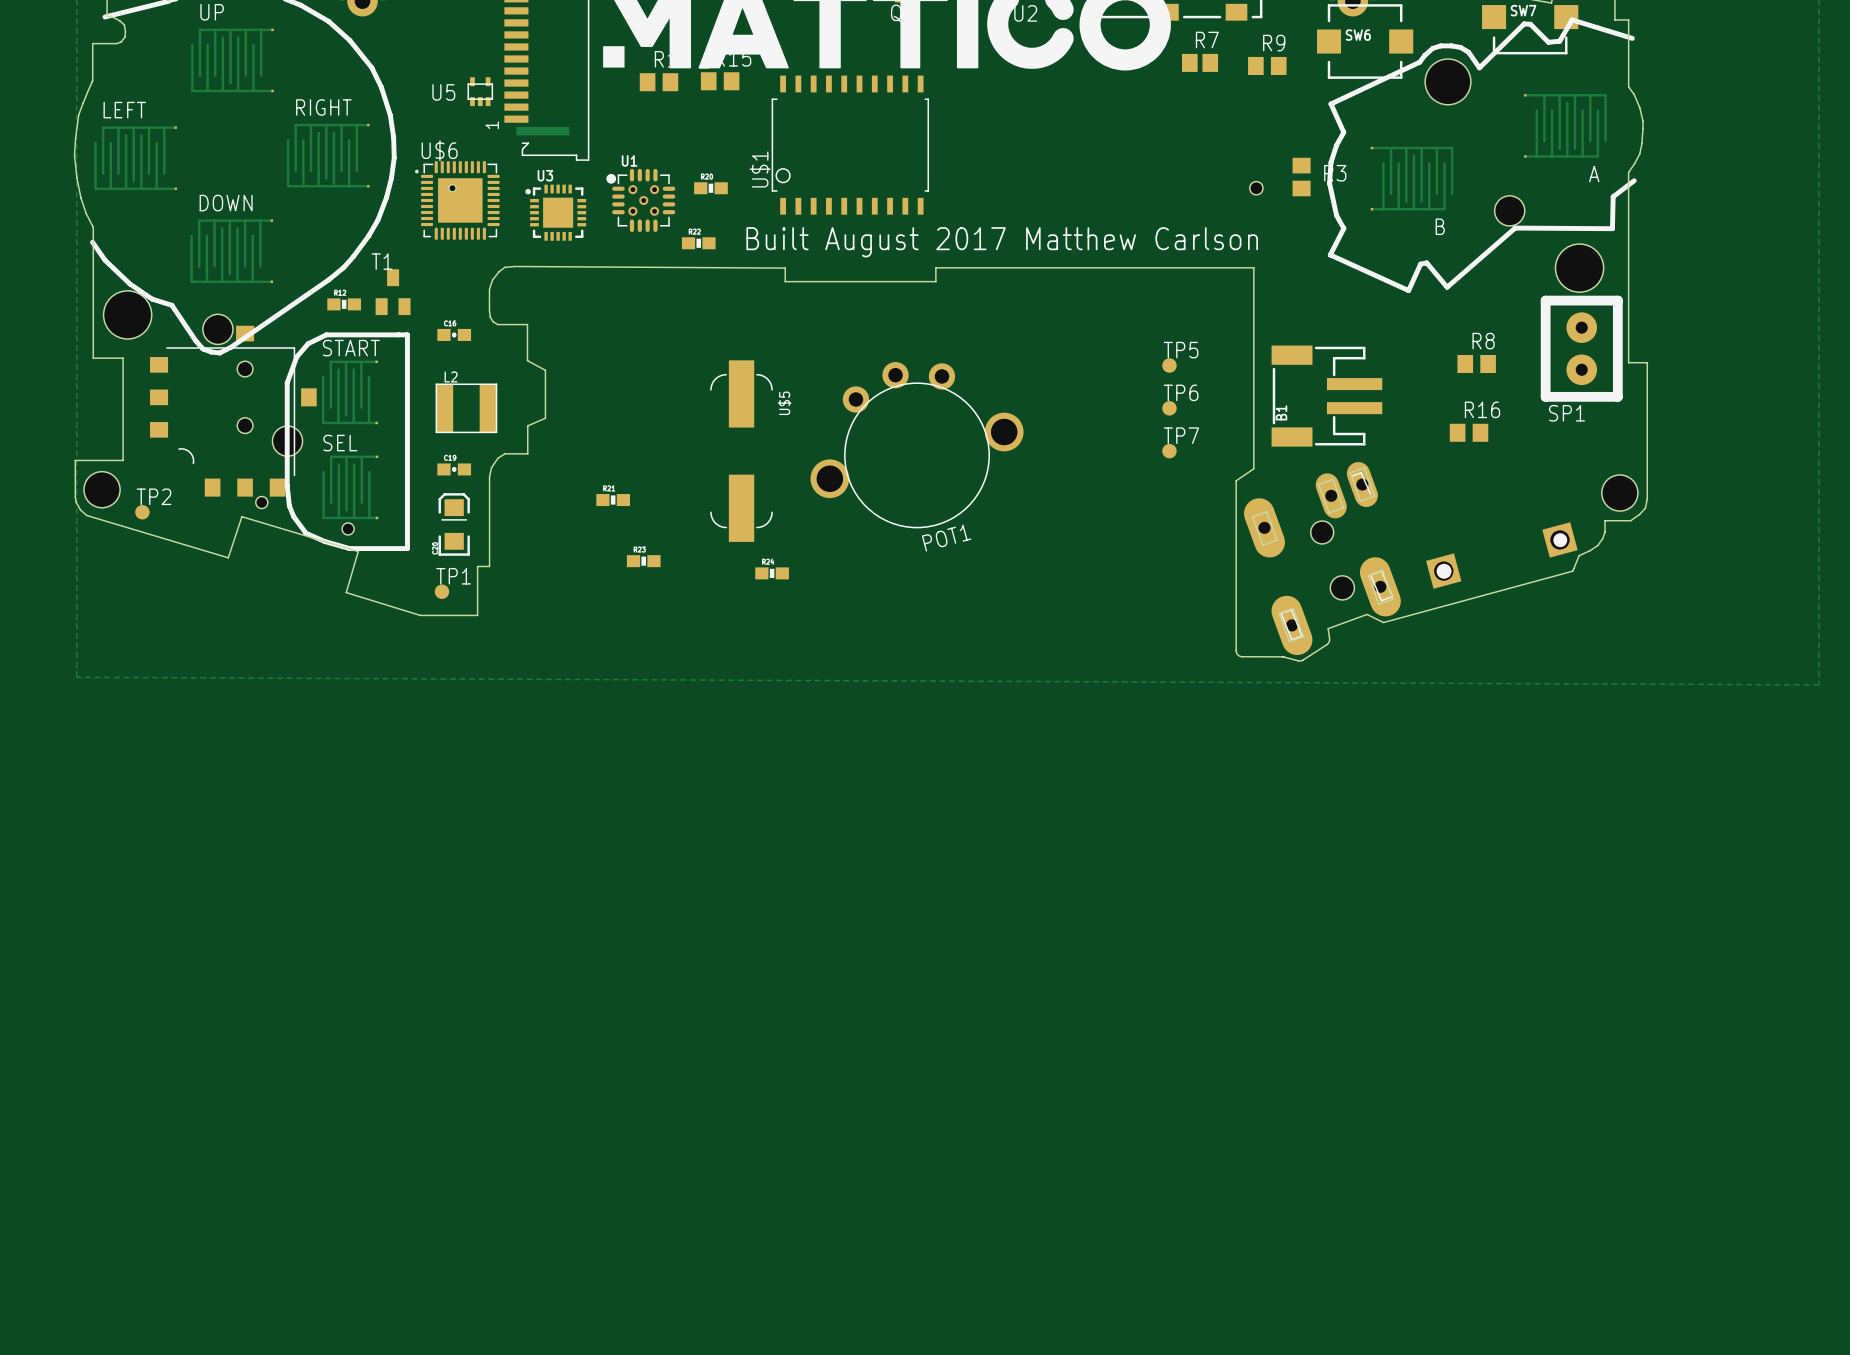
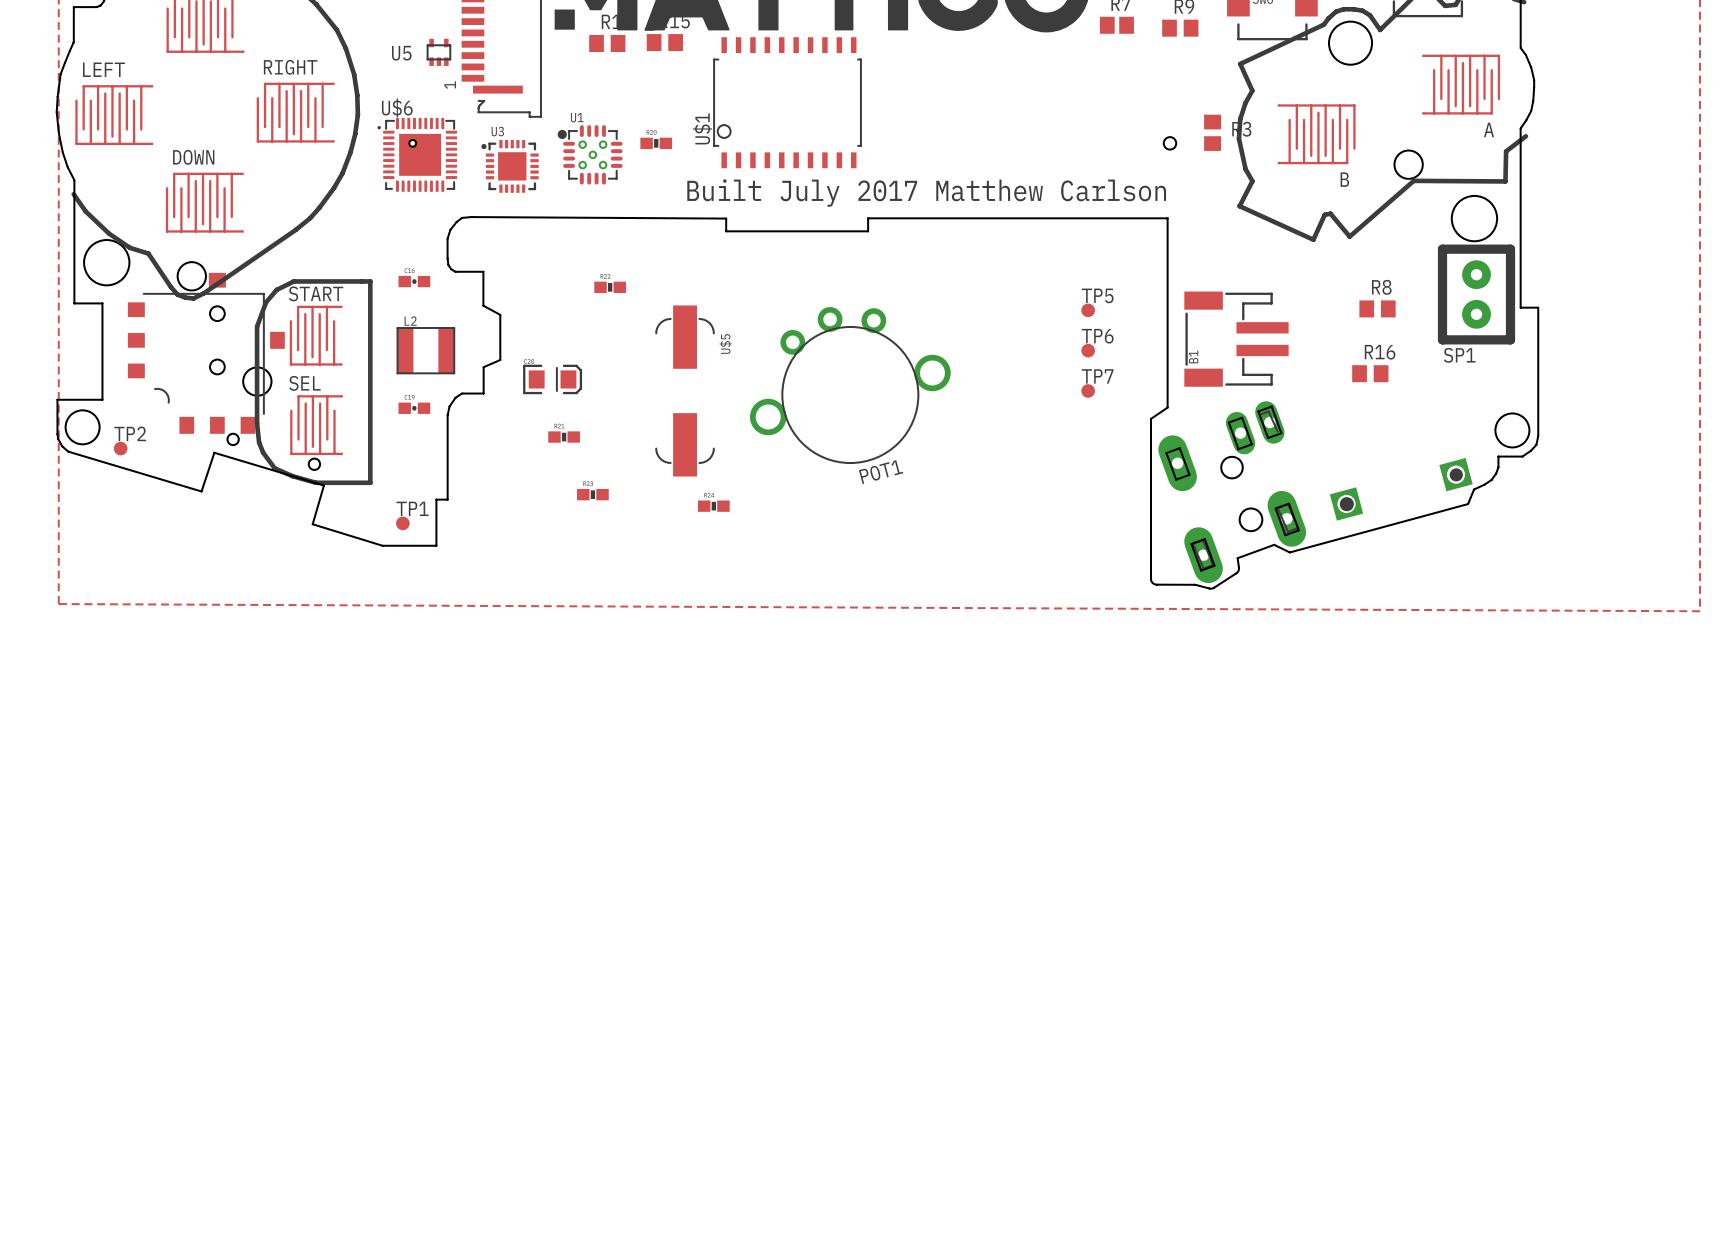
text: Built August 2017 Matthew Carlson (1002, 242) -> Built July 2017 Matthew Carlson (926, 193)
part position: (698, 243) -> (610, 287)
T1: (393, 292) -> none
part: (344, 304) -> none
part rotation: 0° (454, 524) -> 90° clockwise (552, 379)
part position: (454, 524) -> (552, 379)

